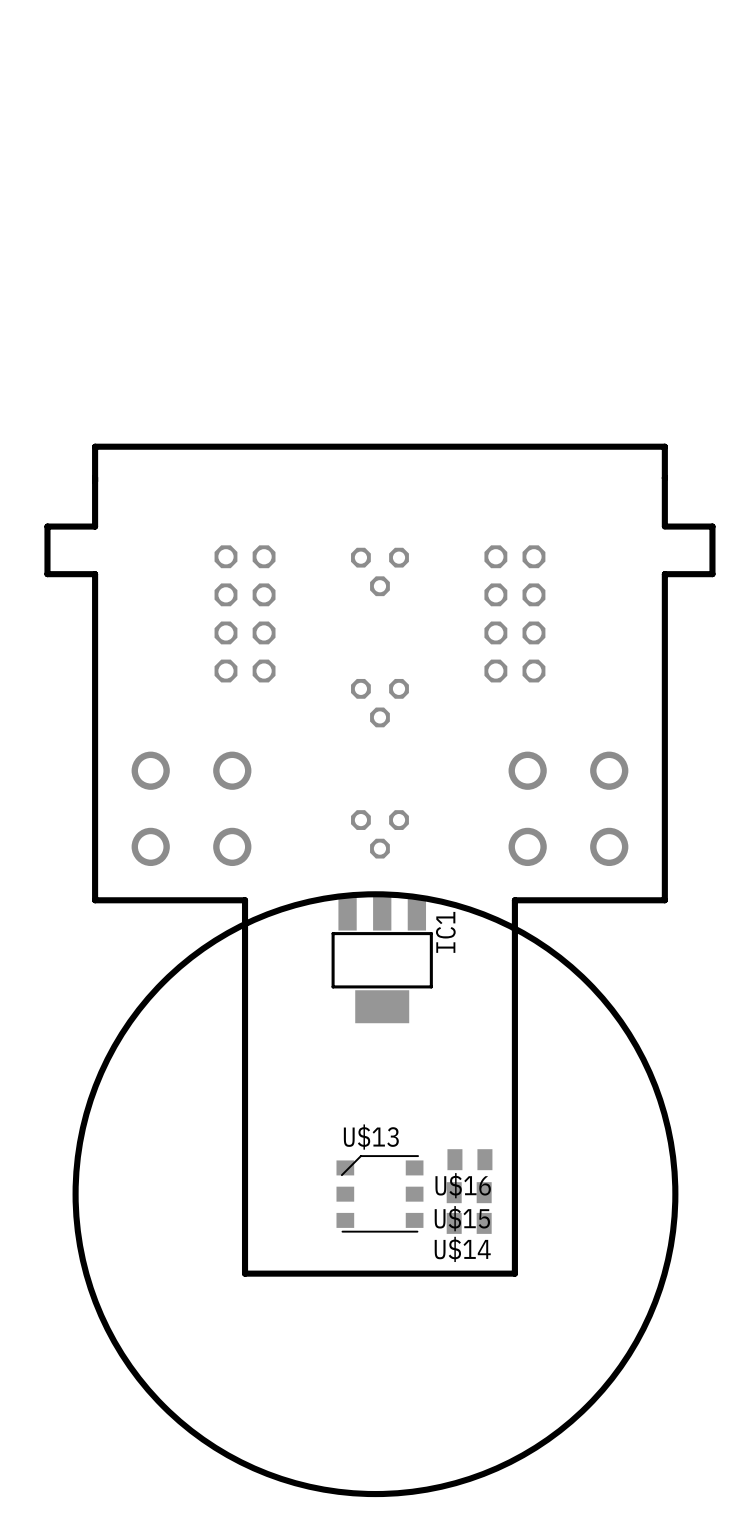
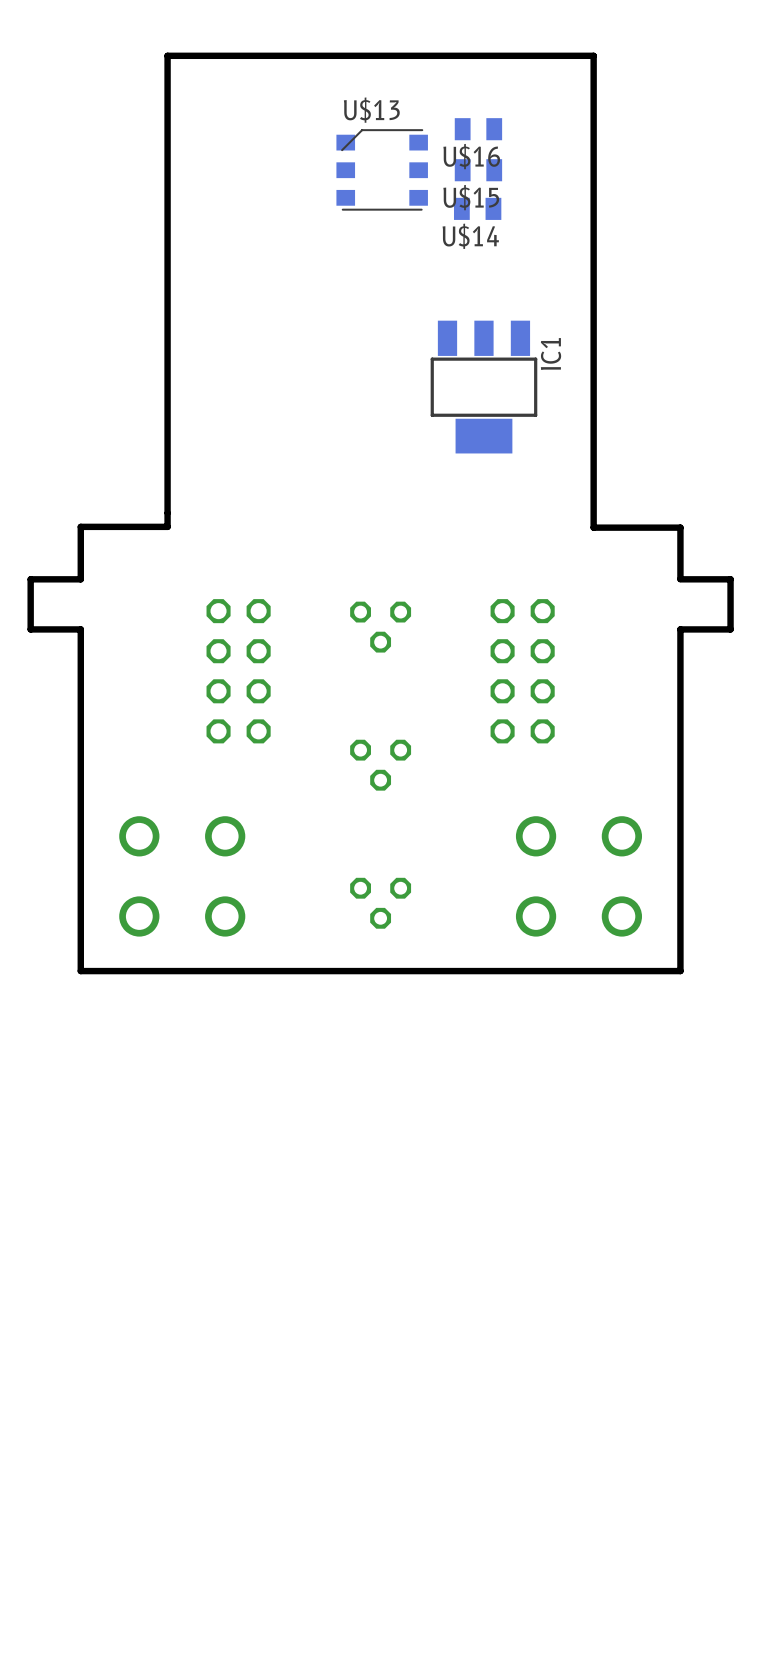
board edge: none -> (167, 513) (167, 526) (80, 526)
board edge: (95, 476) (95, 446) (664, 446) (664, 477) -> (167, 512) (167, 55) (593, 55) (593, 527) (680, 527)
round board edge: [72, 891, 679, 1498] -> none
board edge: (664, 898) (514, 900) (514, 1273) (245, 1273) (245, 900) (95, 898) -> (680, 971) (80, 971)
IC1 position: (382, 960) -> (483, 387)
U$16 position: (469, 1159) -> (478, 129)
U$15 position: (469, 1192) -> (478, 170)
U$13 position: (379, 1193) -> (382, 169)
U$14 position: (469, 1223) -> (477, 208)

